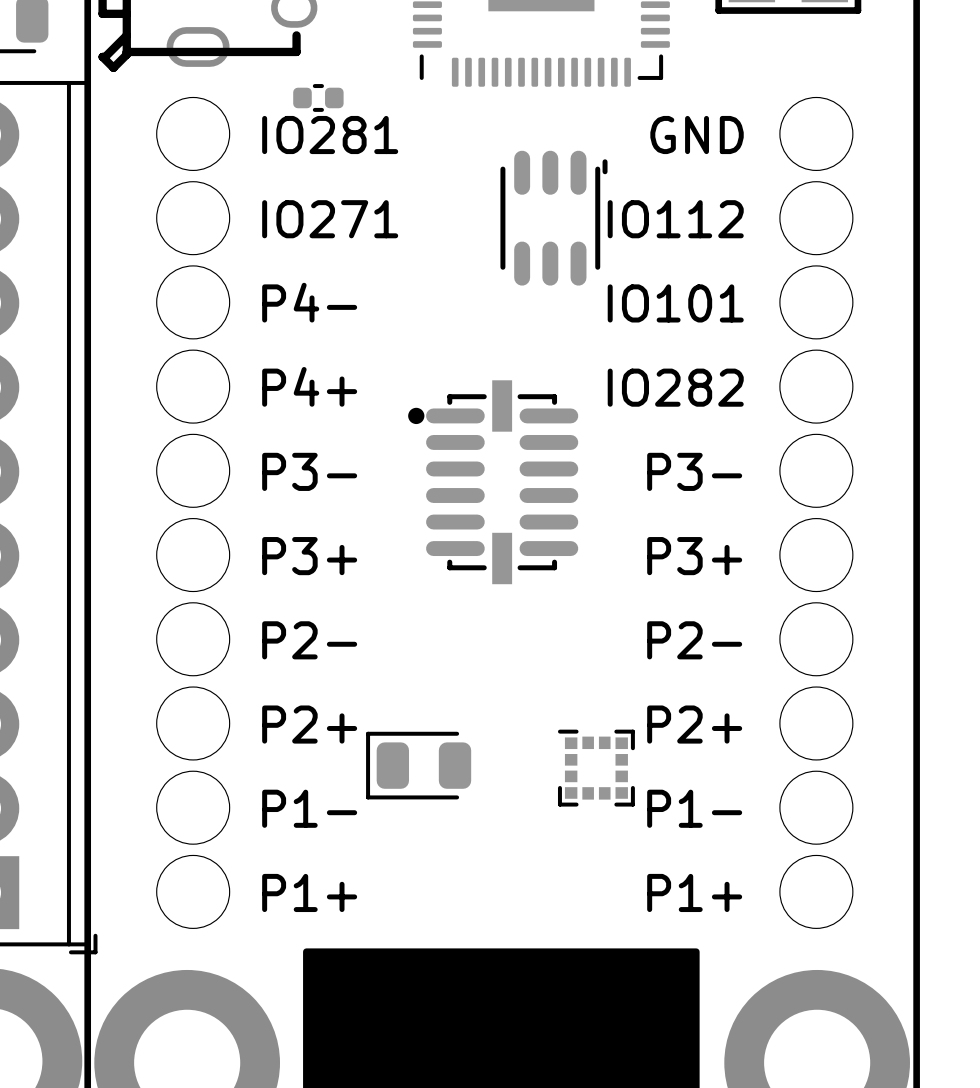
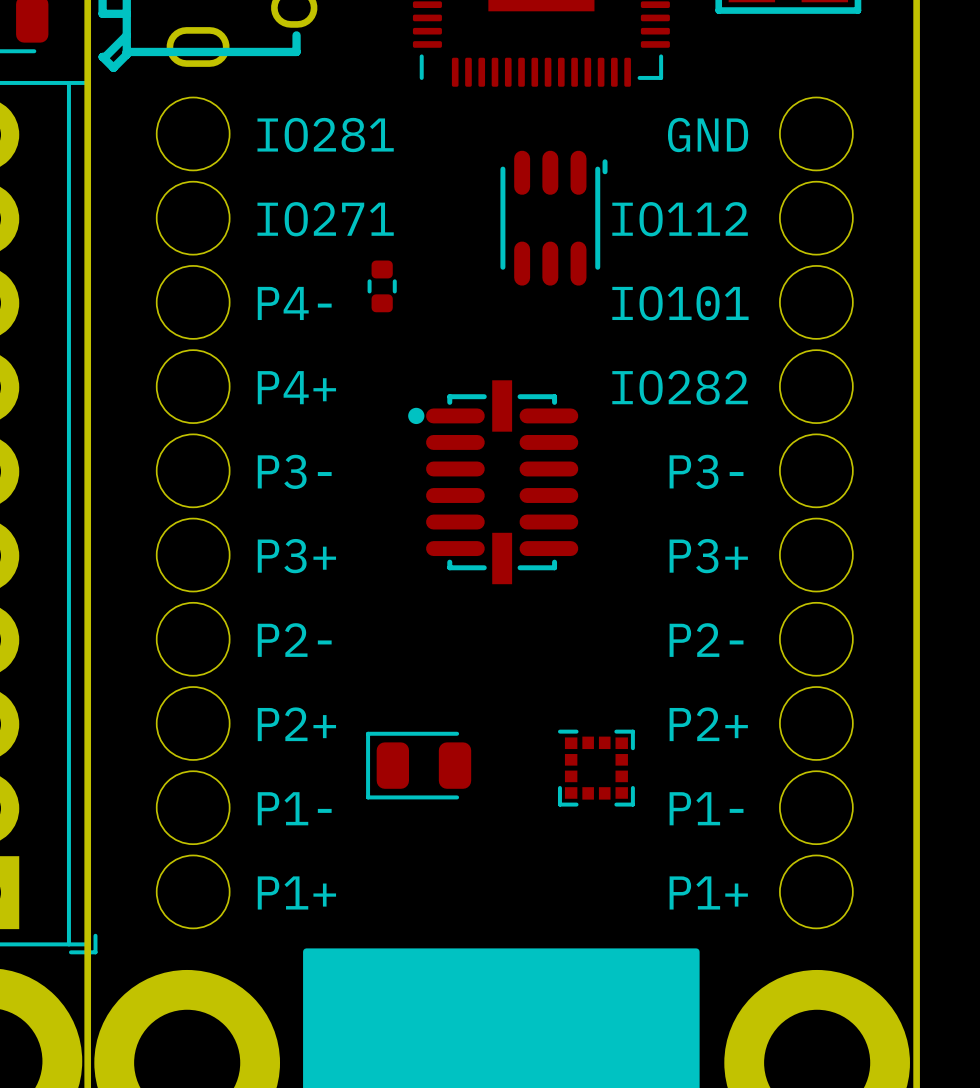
part: (318, 97) -> none
part: none -> (382, 286)

